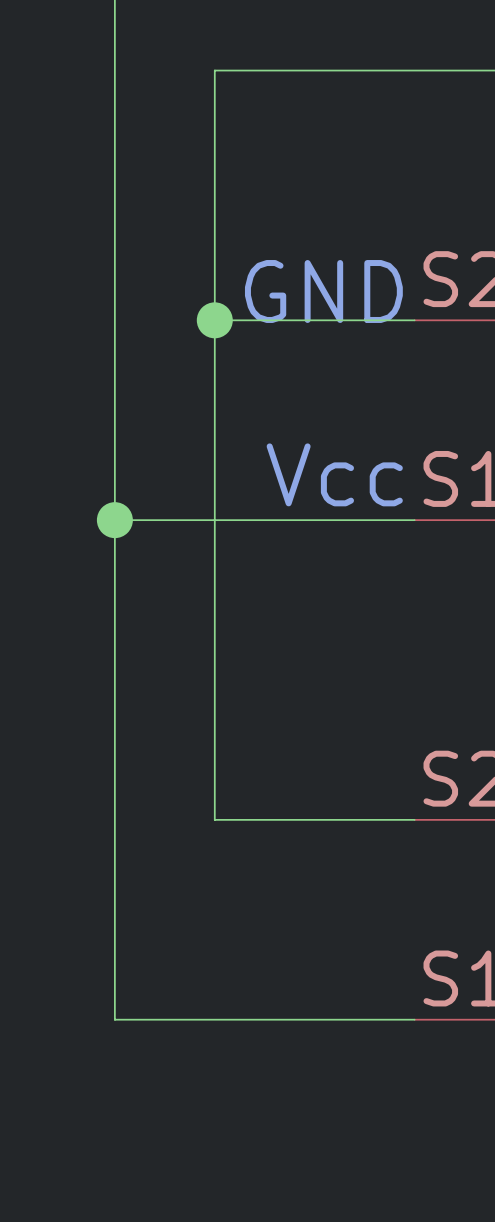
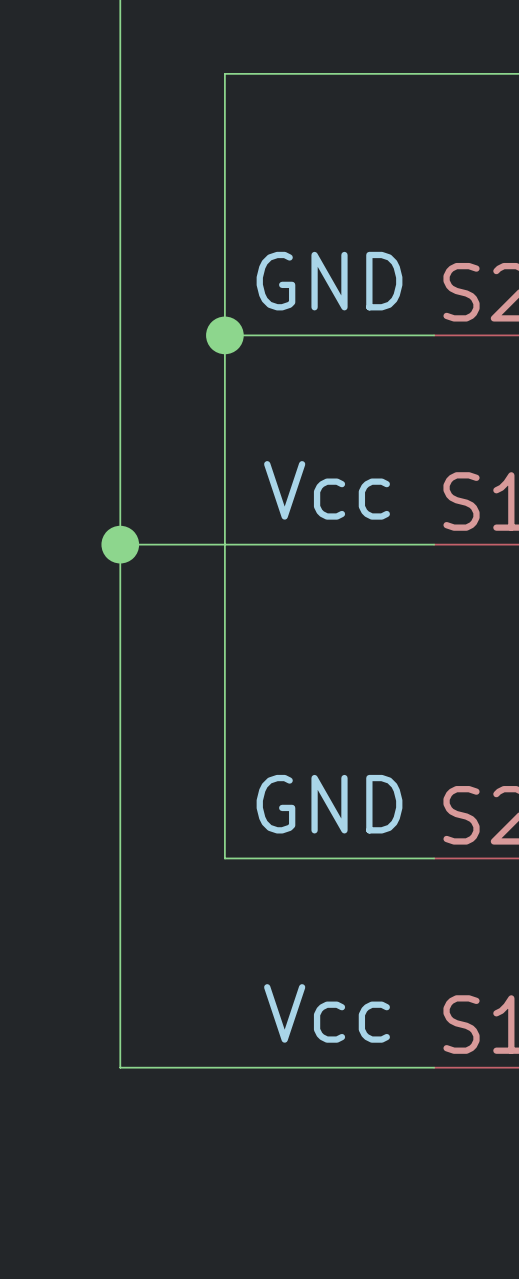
part text: none -> GND (329, 281)
text: GND (323, 291) -> none
part text: none -> Vcc (327, 490)
text: Vcc (334, 474) -> none
part text: none -> GND (329, 804)
part text: none -> Vcc (327, 1013)

